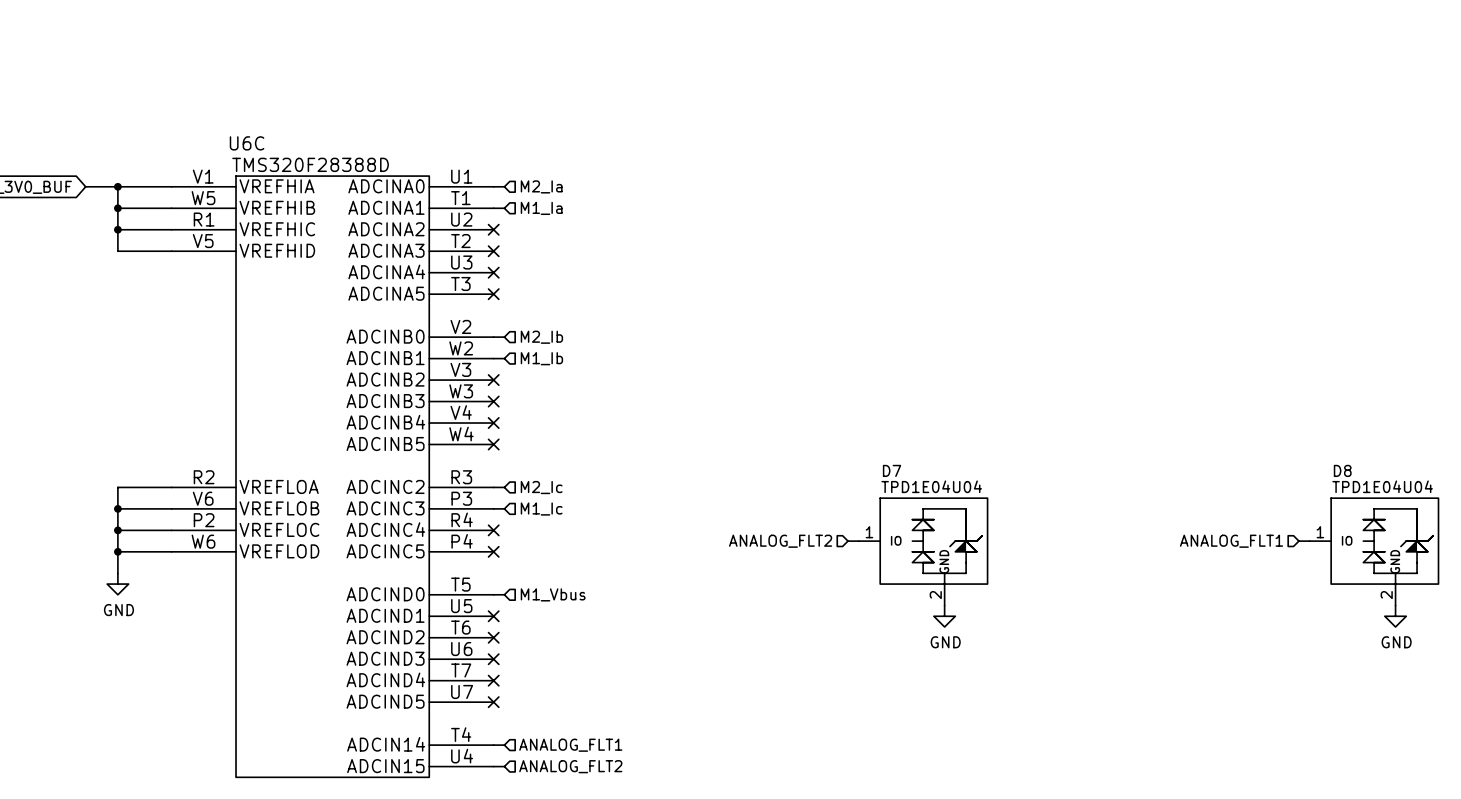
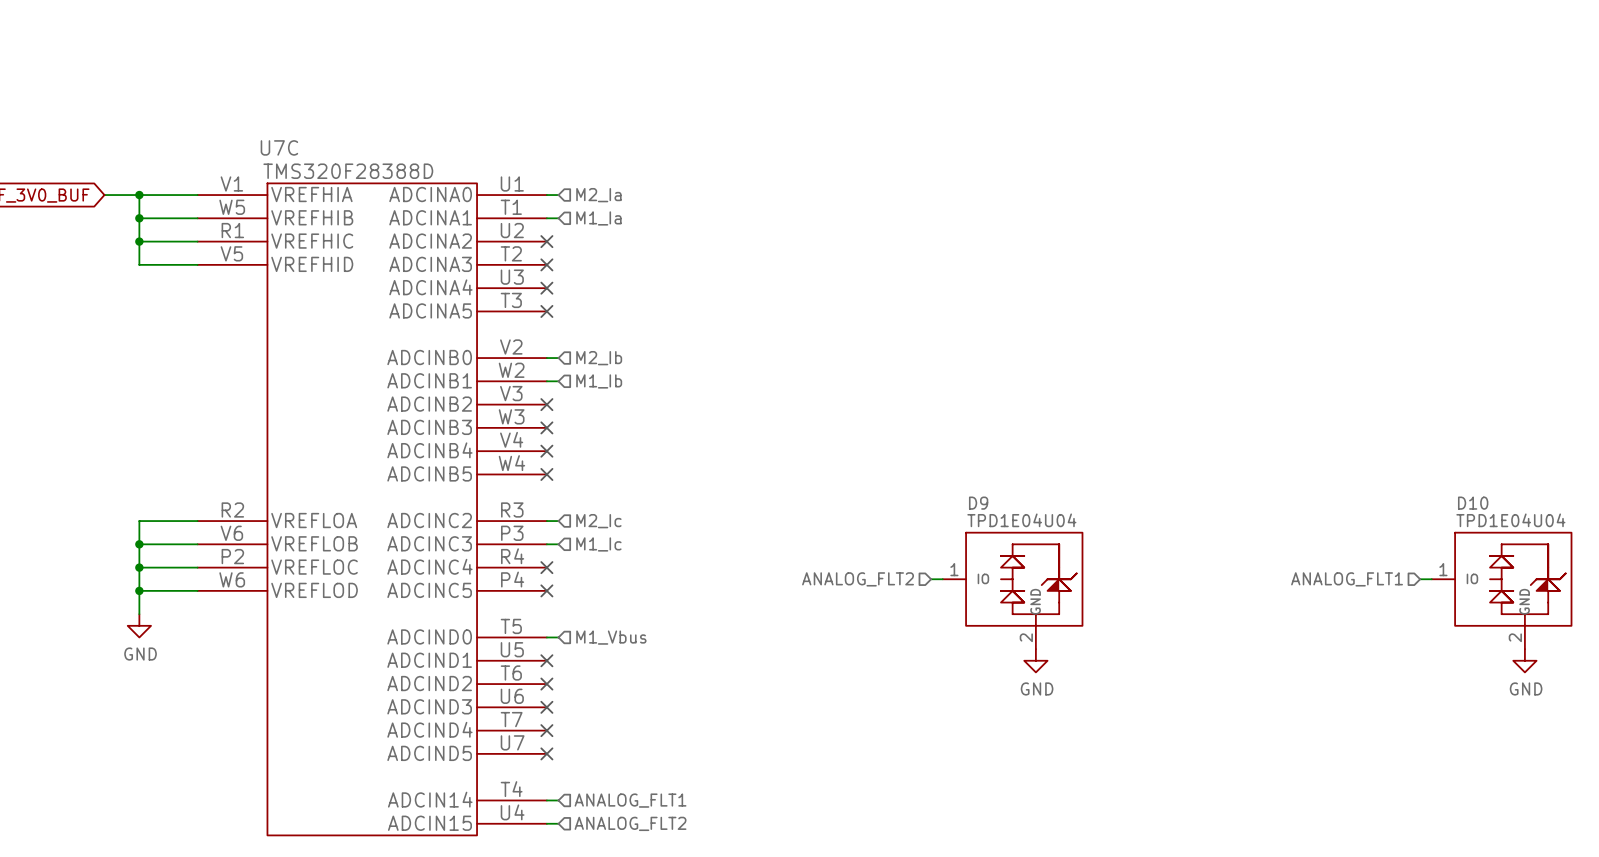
U6C name: U6C (247, 143) -> U7C (279, 147)
D7 name: D7 (892, 470) -> D9 (978, 503)
D8 name: D8 (1342, 470) -> D10 (1473, 503)

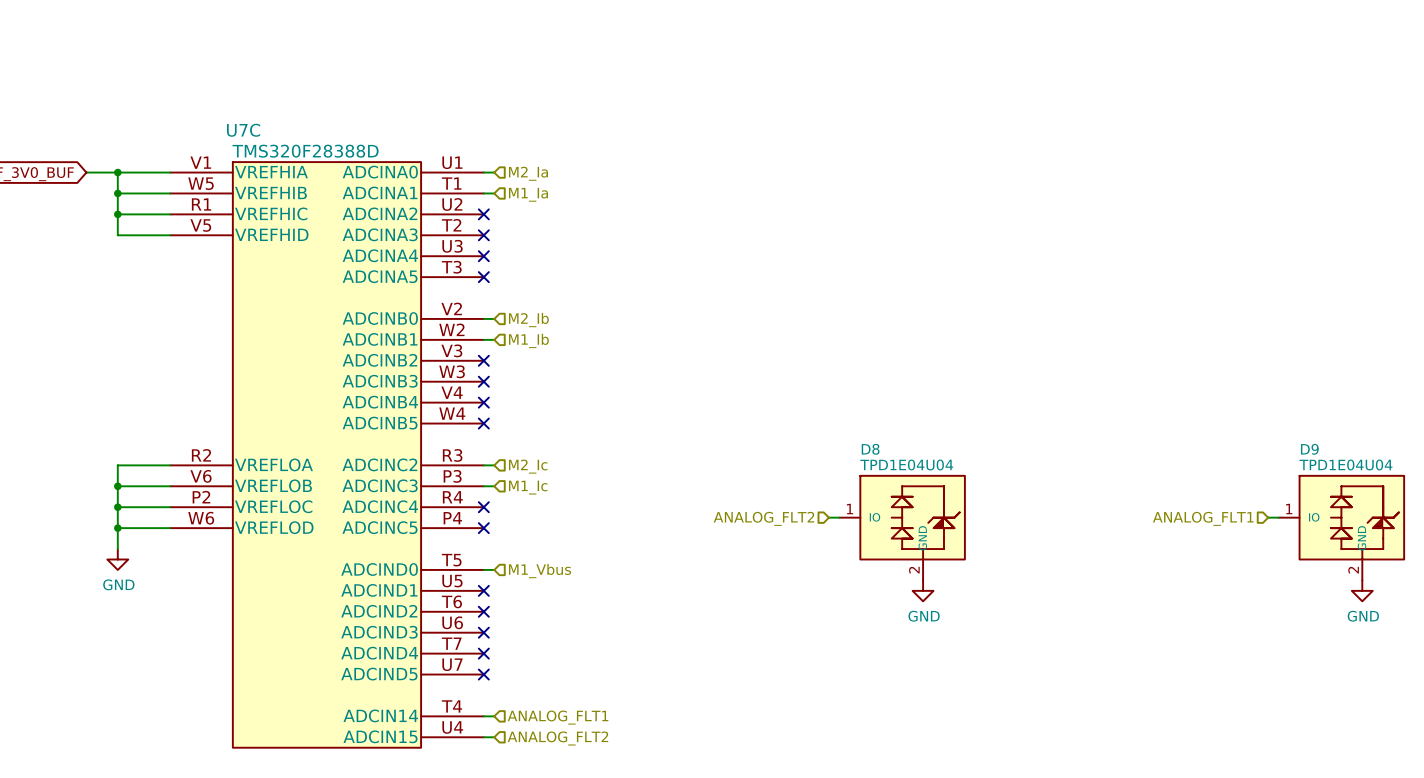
D9 name: D9 (978, 503) -> D8 (870, 449)
D10 name: D10 (1473, 503) -> D9 (1309, 449)

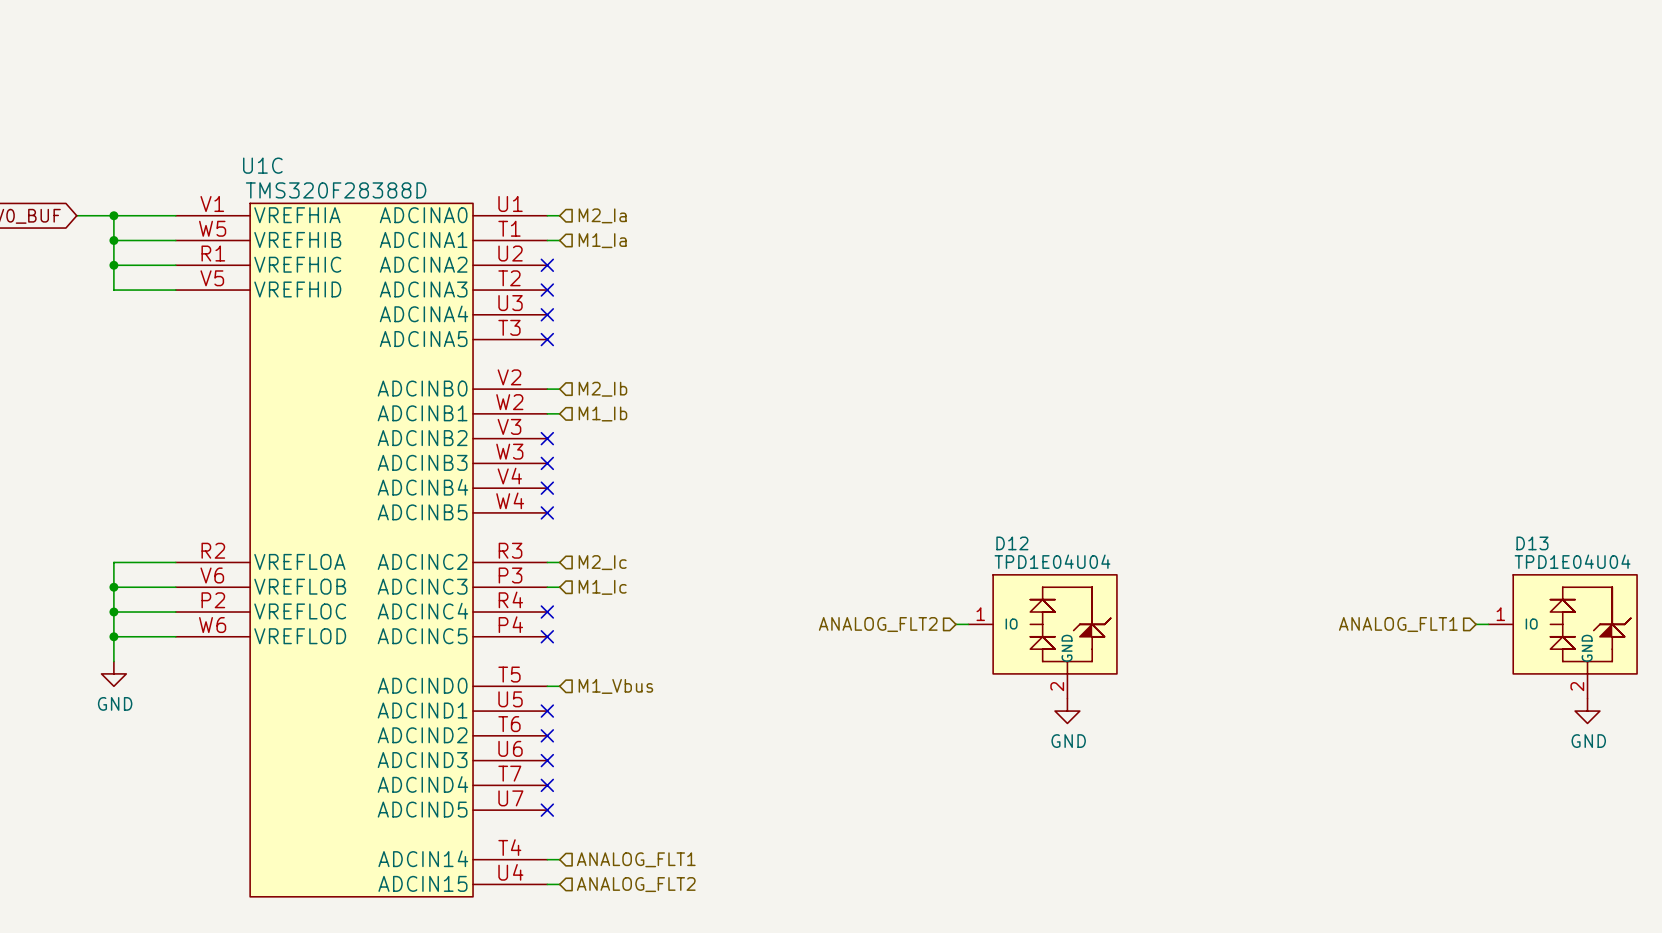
U7C name: U7C (243, 130) -> U1C (262, 165)
D8 name: D8 (870, 449) -> D12 (1012, 543)
D9 name: D9 (1309, 449) -> D13 (1532, 543)

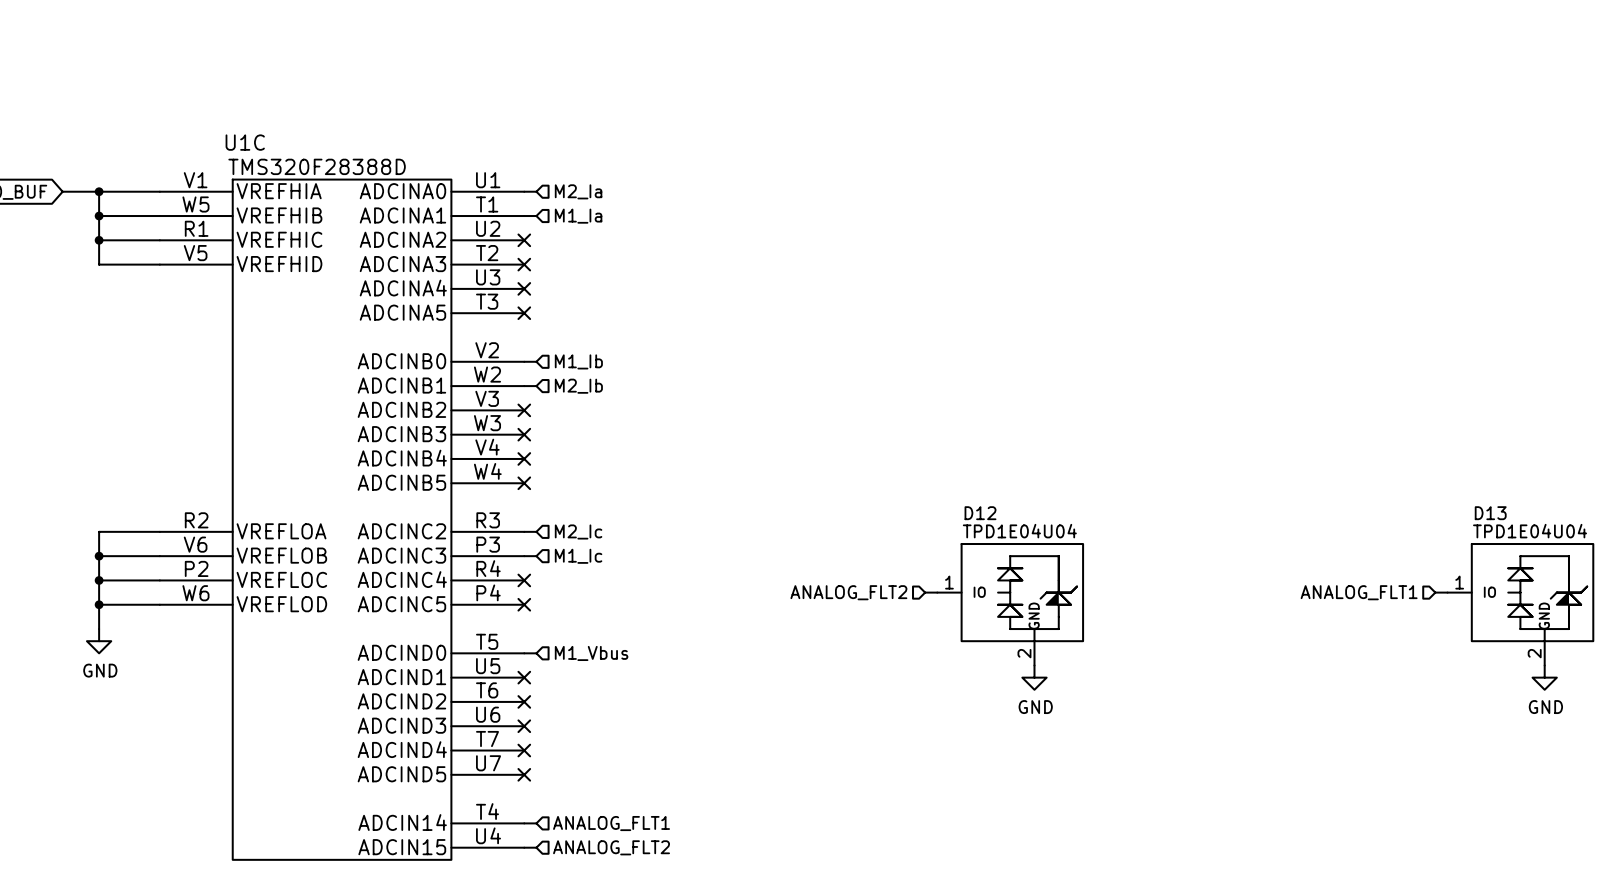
hierarchical label: M2_Ib (602, 389) -> M1_Ib (578, 361)
hierarchical label: M1_Ib (602, 414) -> M2_Ib (578, 386)

